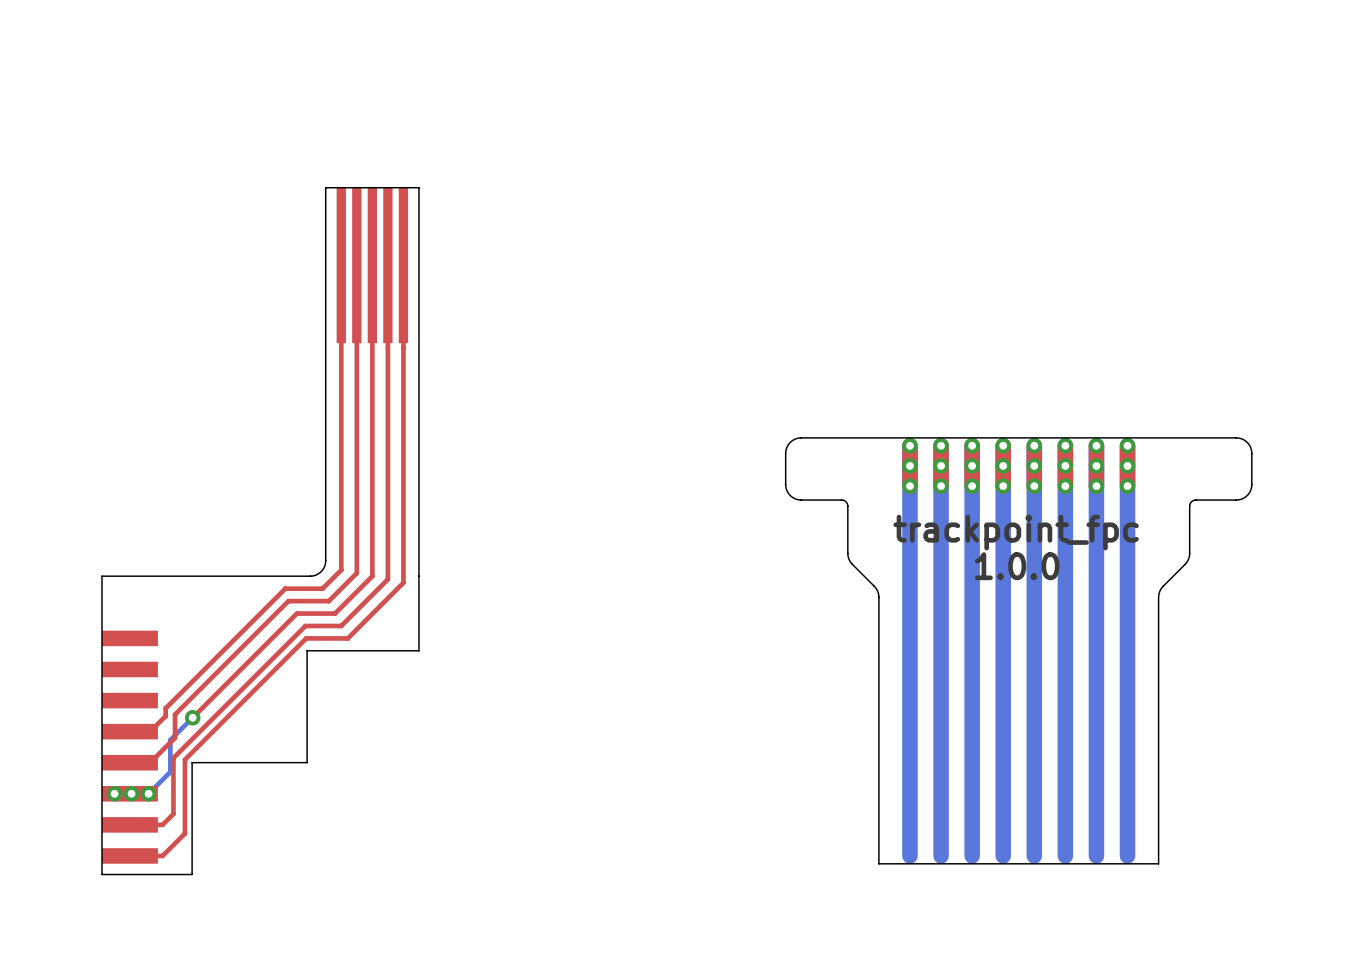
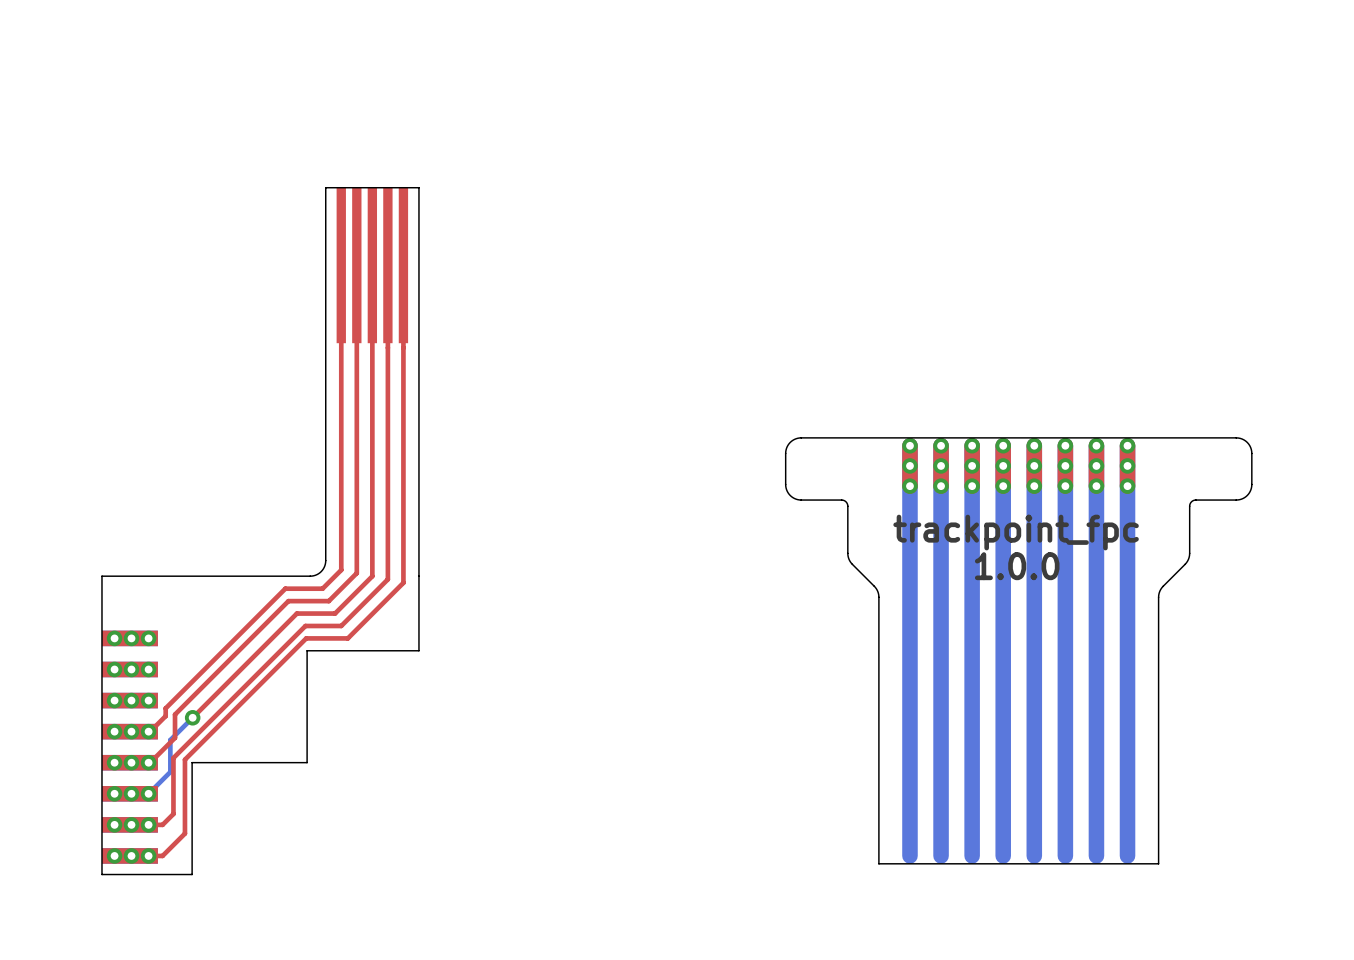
via: none -> (114, 638)
via: none -> (131, 638)
via: none -> (148, 638)
via: none -> (114, 669)
via: none -> (131, 669)
via: none -> (148, 669)
via: none -> (114, 700)
via: none -> (131, 700)
via: none -> (148, 700)
via: none -> (114, 731)
via: none -> (131, 731)
via: none -> (148, 731)
via: none -> (114, 762)
via: none -> (131, 762)
via: none -> (148, 762)
via: none -> (114, 824)
via: none -> (131, 824)
via: none -> (148, 824)
via: none -> (114, 855)
via: none -> (131, 855)
via: none -> (148, 855)

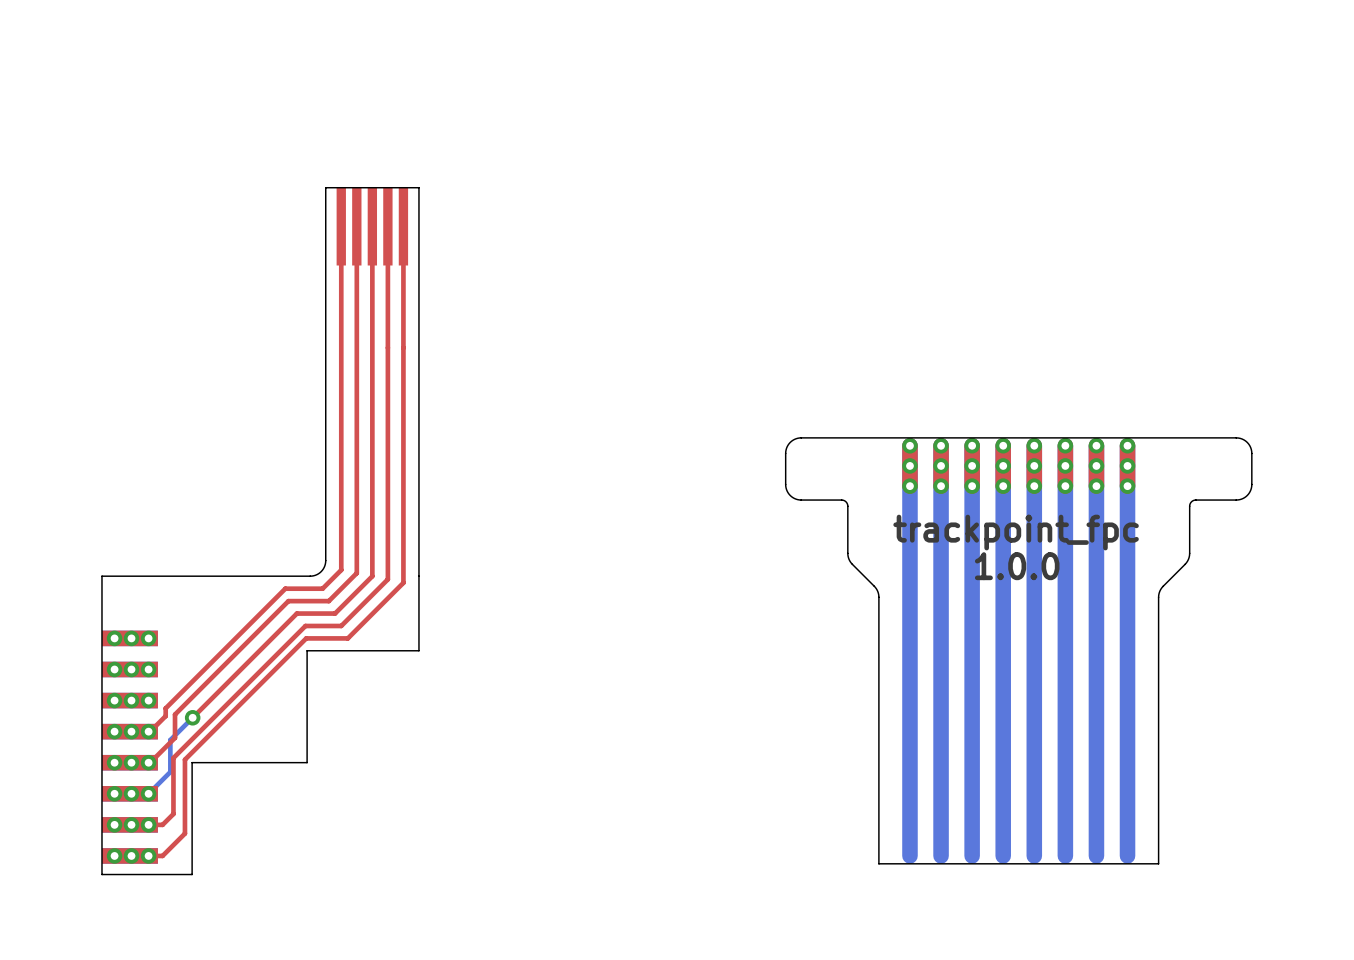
part: none -> (372, 226)
top track: none -> (341, 253) (341, 324)
top track: none -> (356, 253) (356, 330)
top track: none -> (372, 256) (372, 318)
part: (372, 265) -> none

